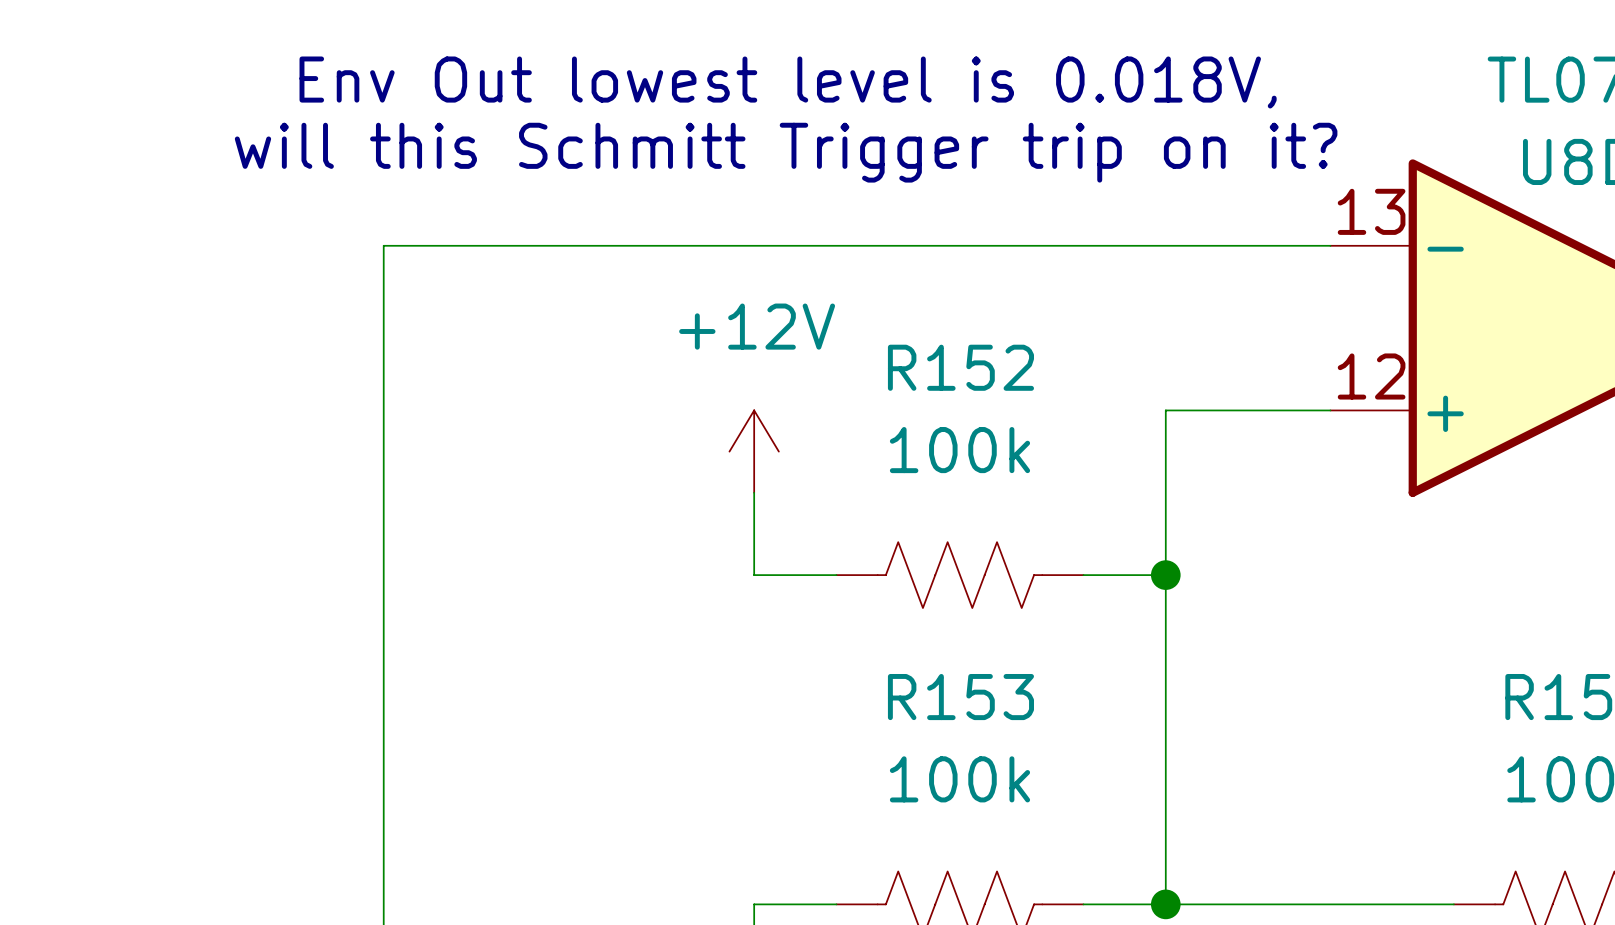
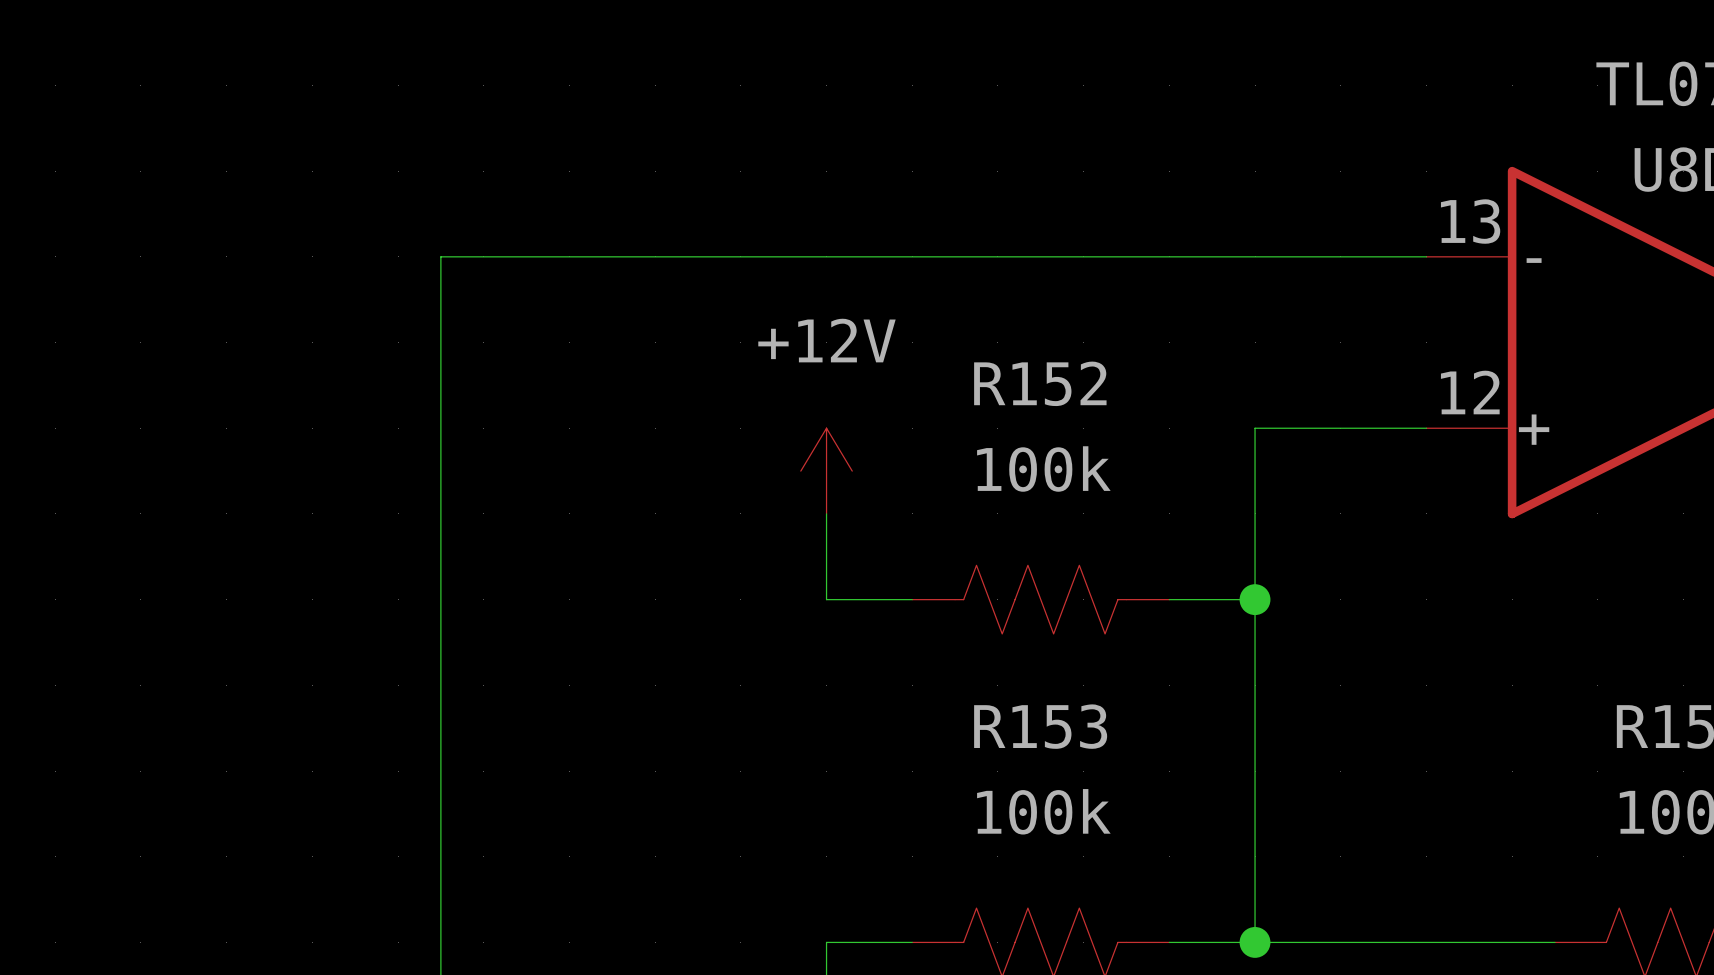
text: Env Out lowest level is 0.018V, (788, 82) -> none
text: will this Schmitt Trigger trip on it? (786, 152) -> none

